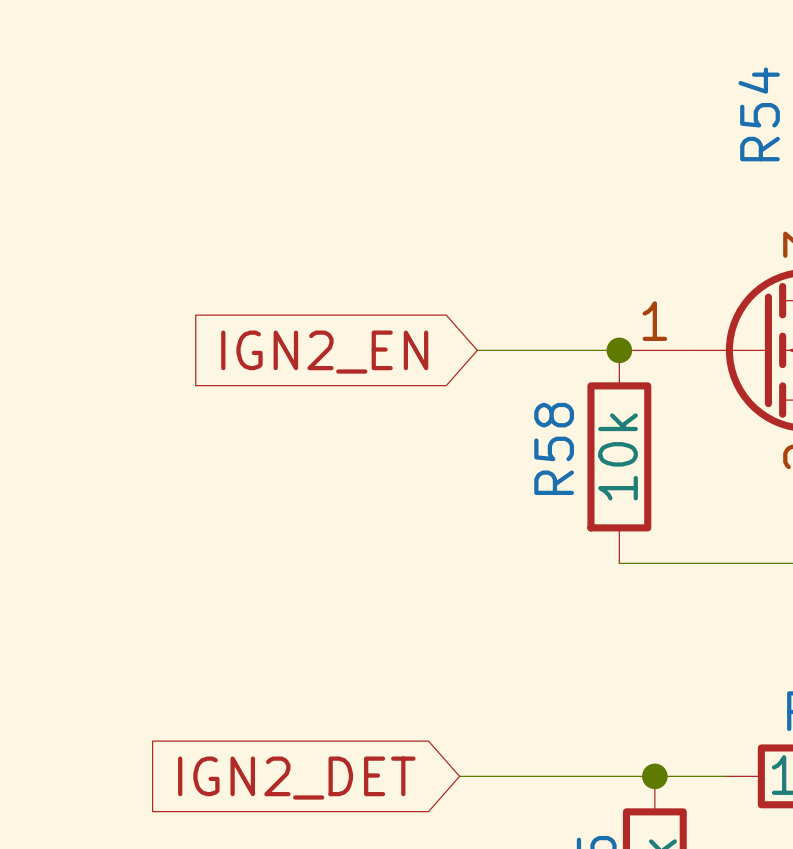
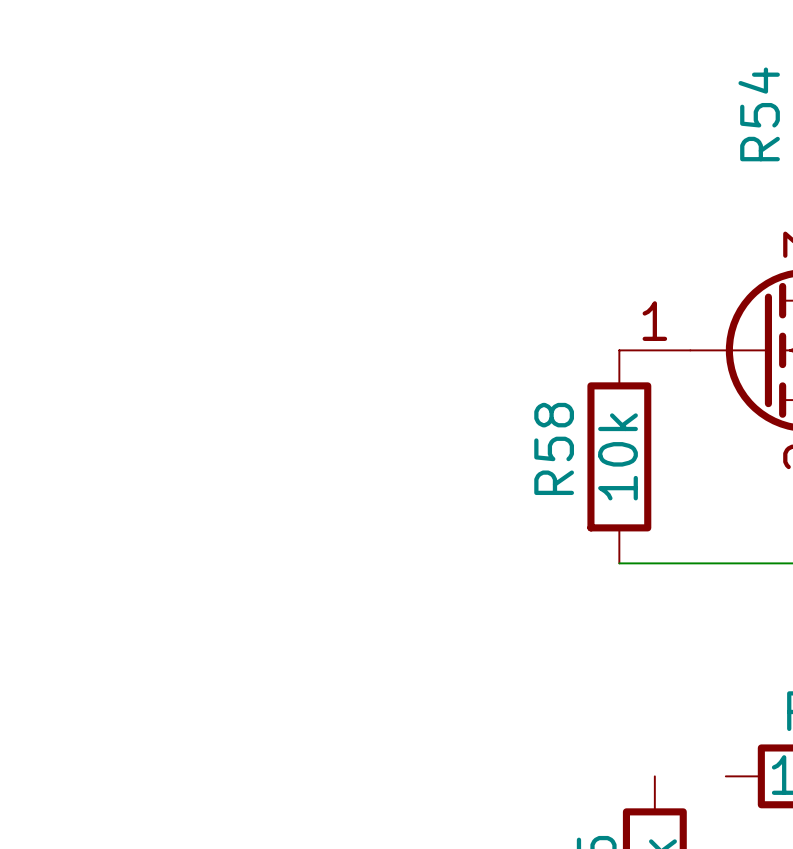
wire: (477, 350) (619, 350) -> none
junction: (619, 350) -> none
global label: IGN2_EN (324, 352) -> none
wire: (459, 776) (725, 776) -> none
junction: (654, 776) -> none
global label: IGN2_DET (296, 778) -> none

